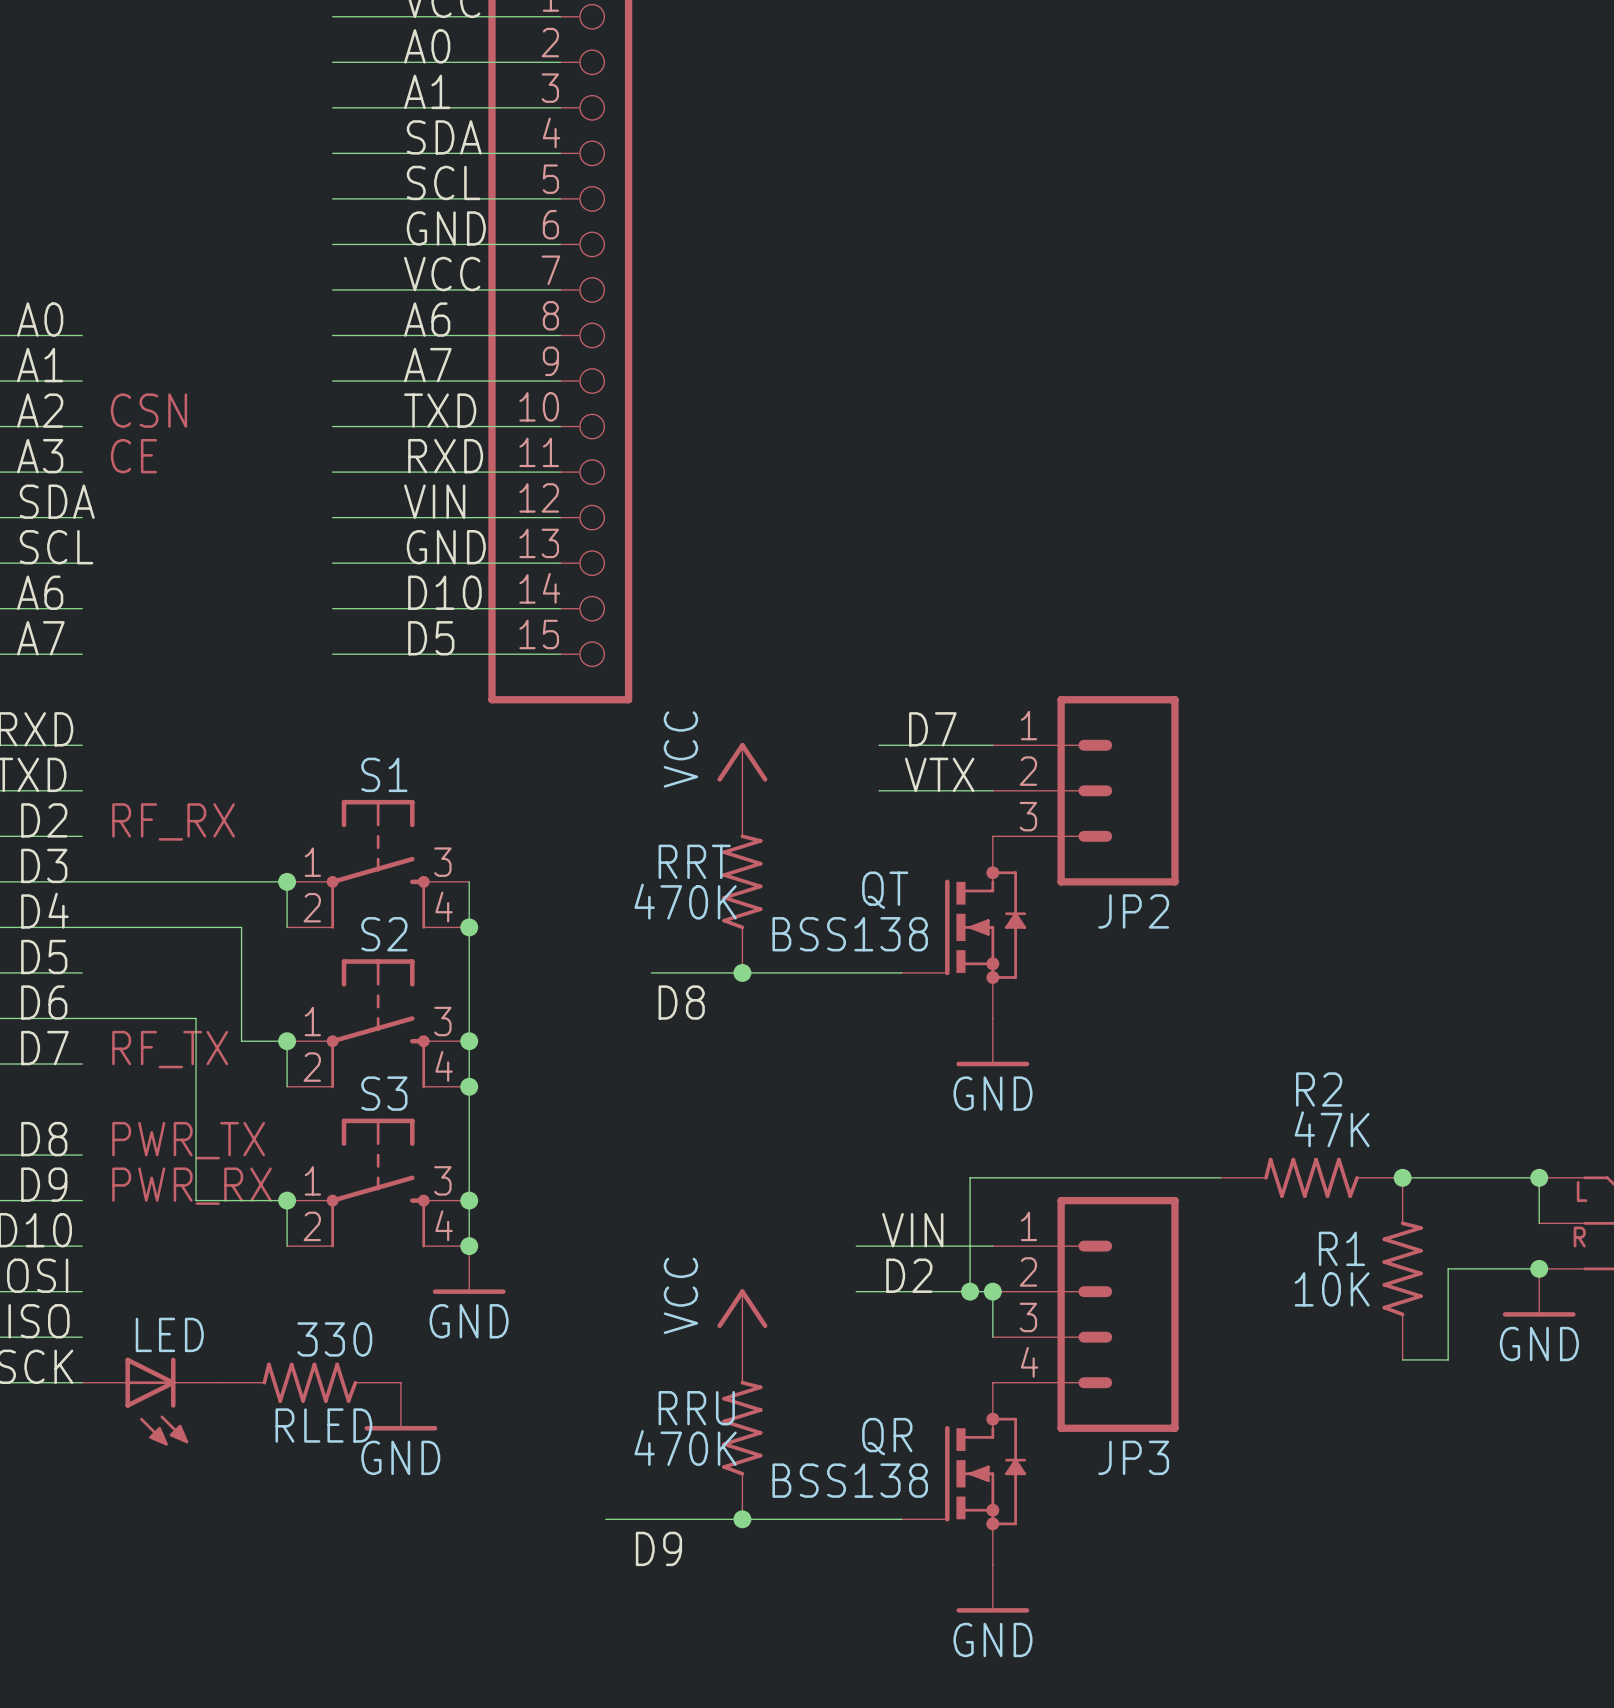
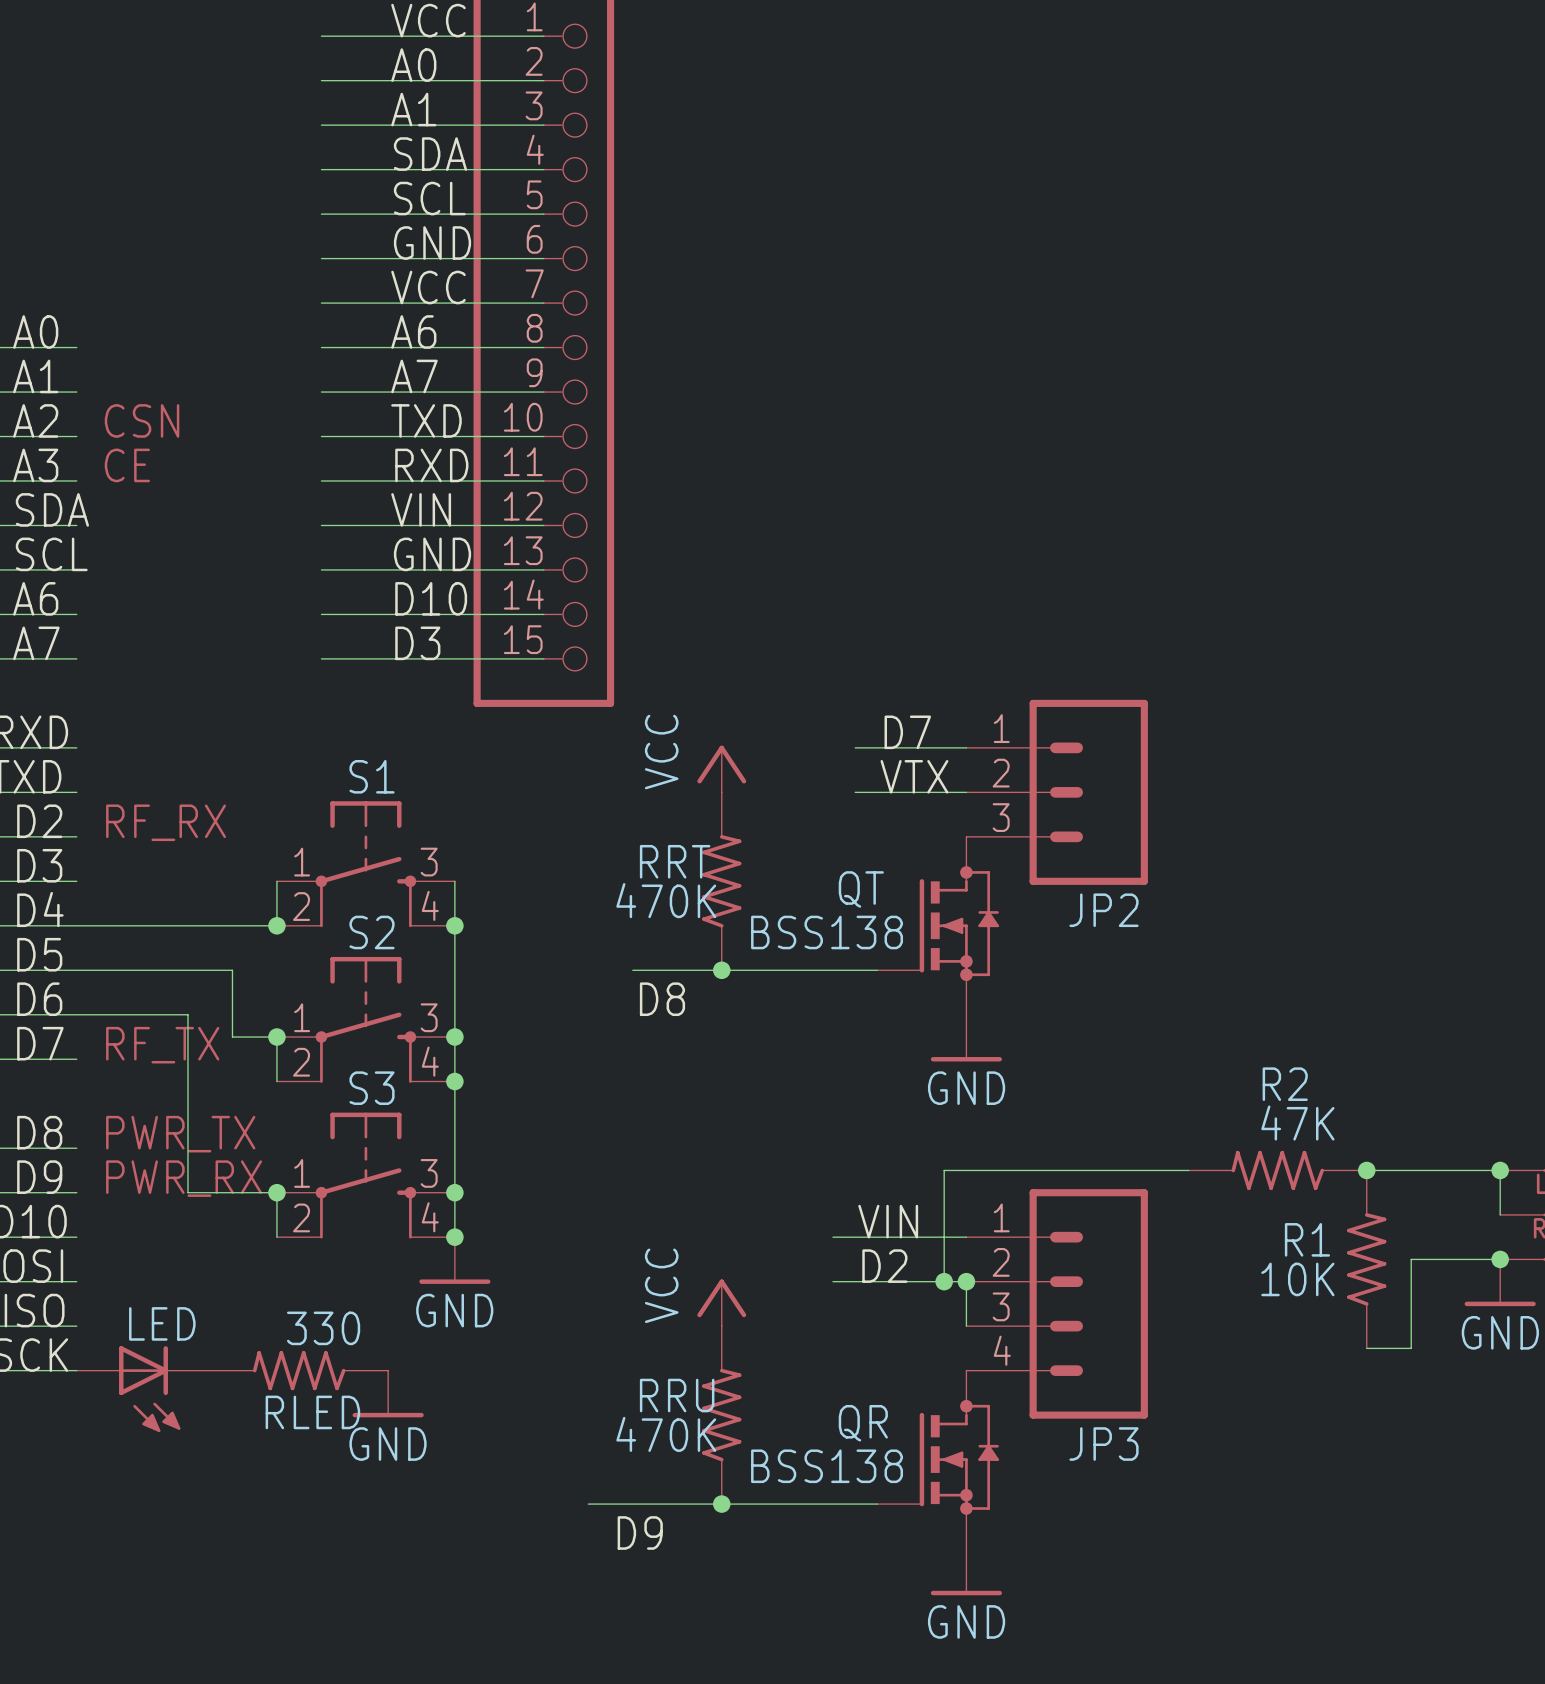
label: D5 (431, 638) -> D3 (417, 643)
wire: (82, 881) (287, 881) -> none
junction position: (287, 881) -> (276, 925)
wire: (241, 927) (241, 972) -> (232, 925) (276, 925)
wire: none -> (76, 970) (232, 970)

